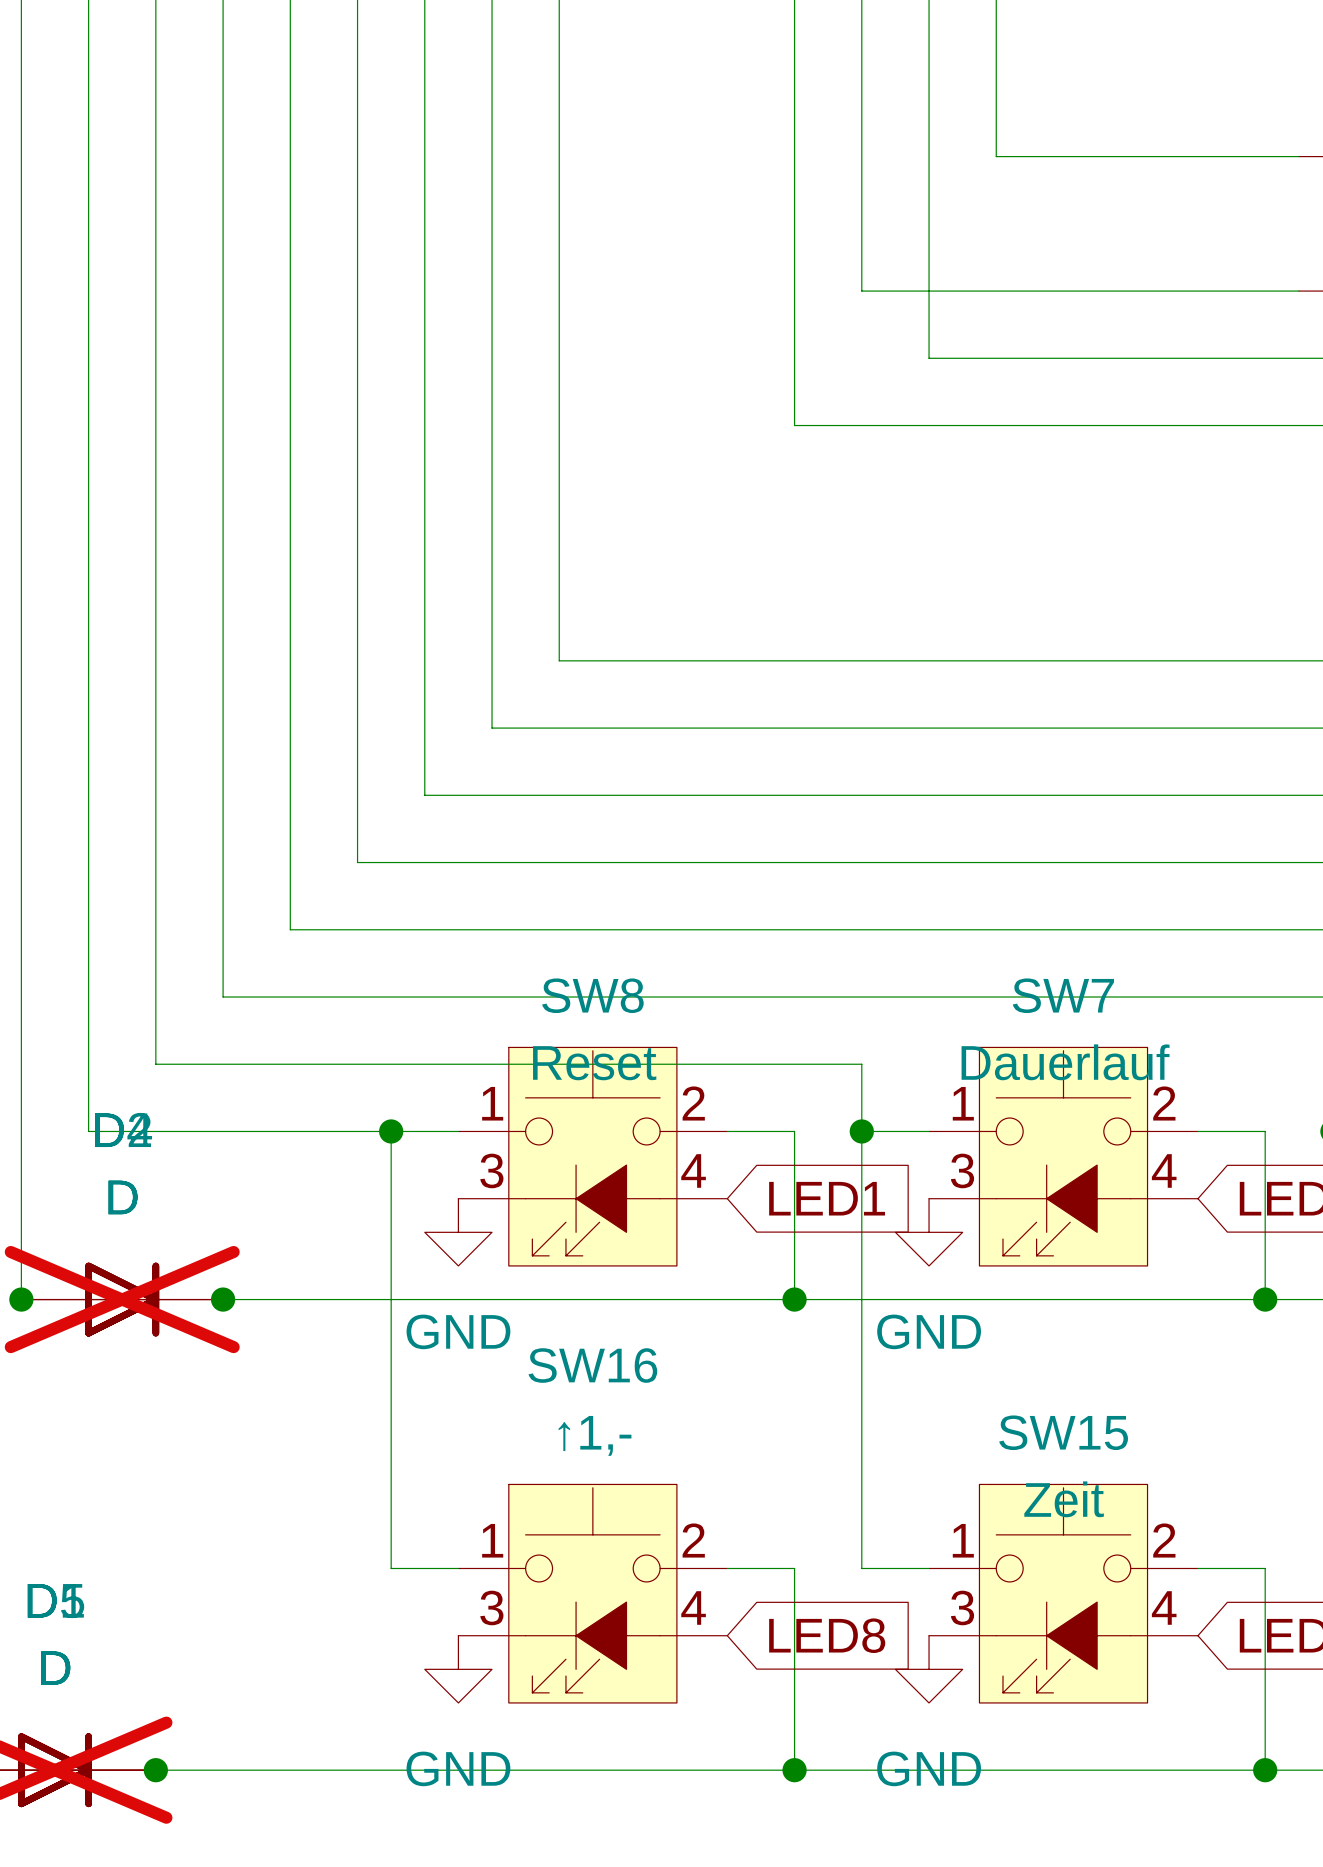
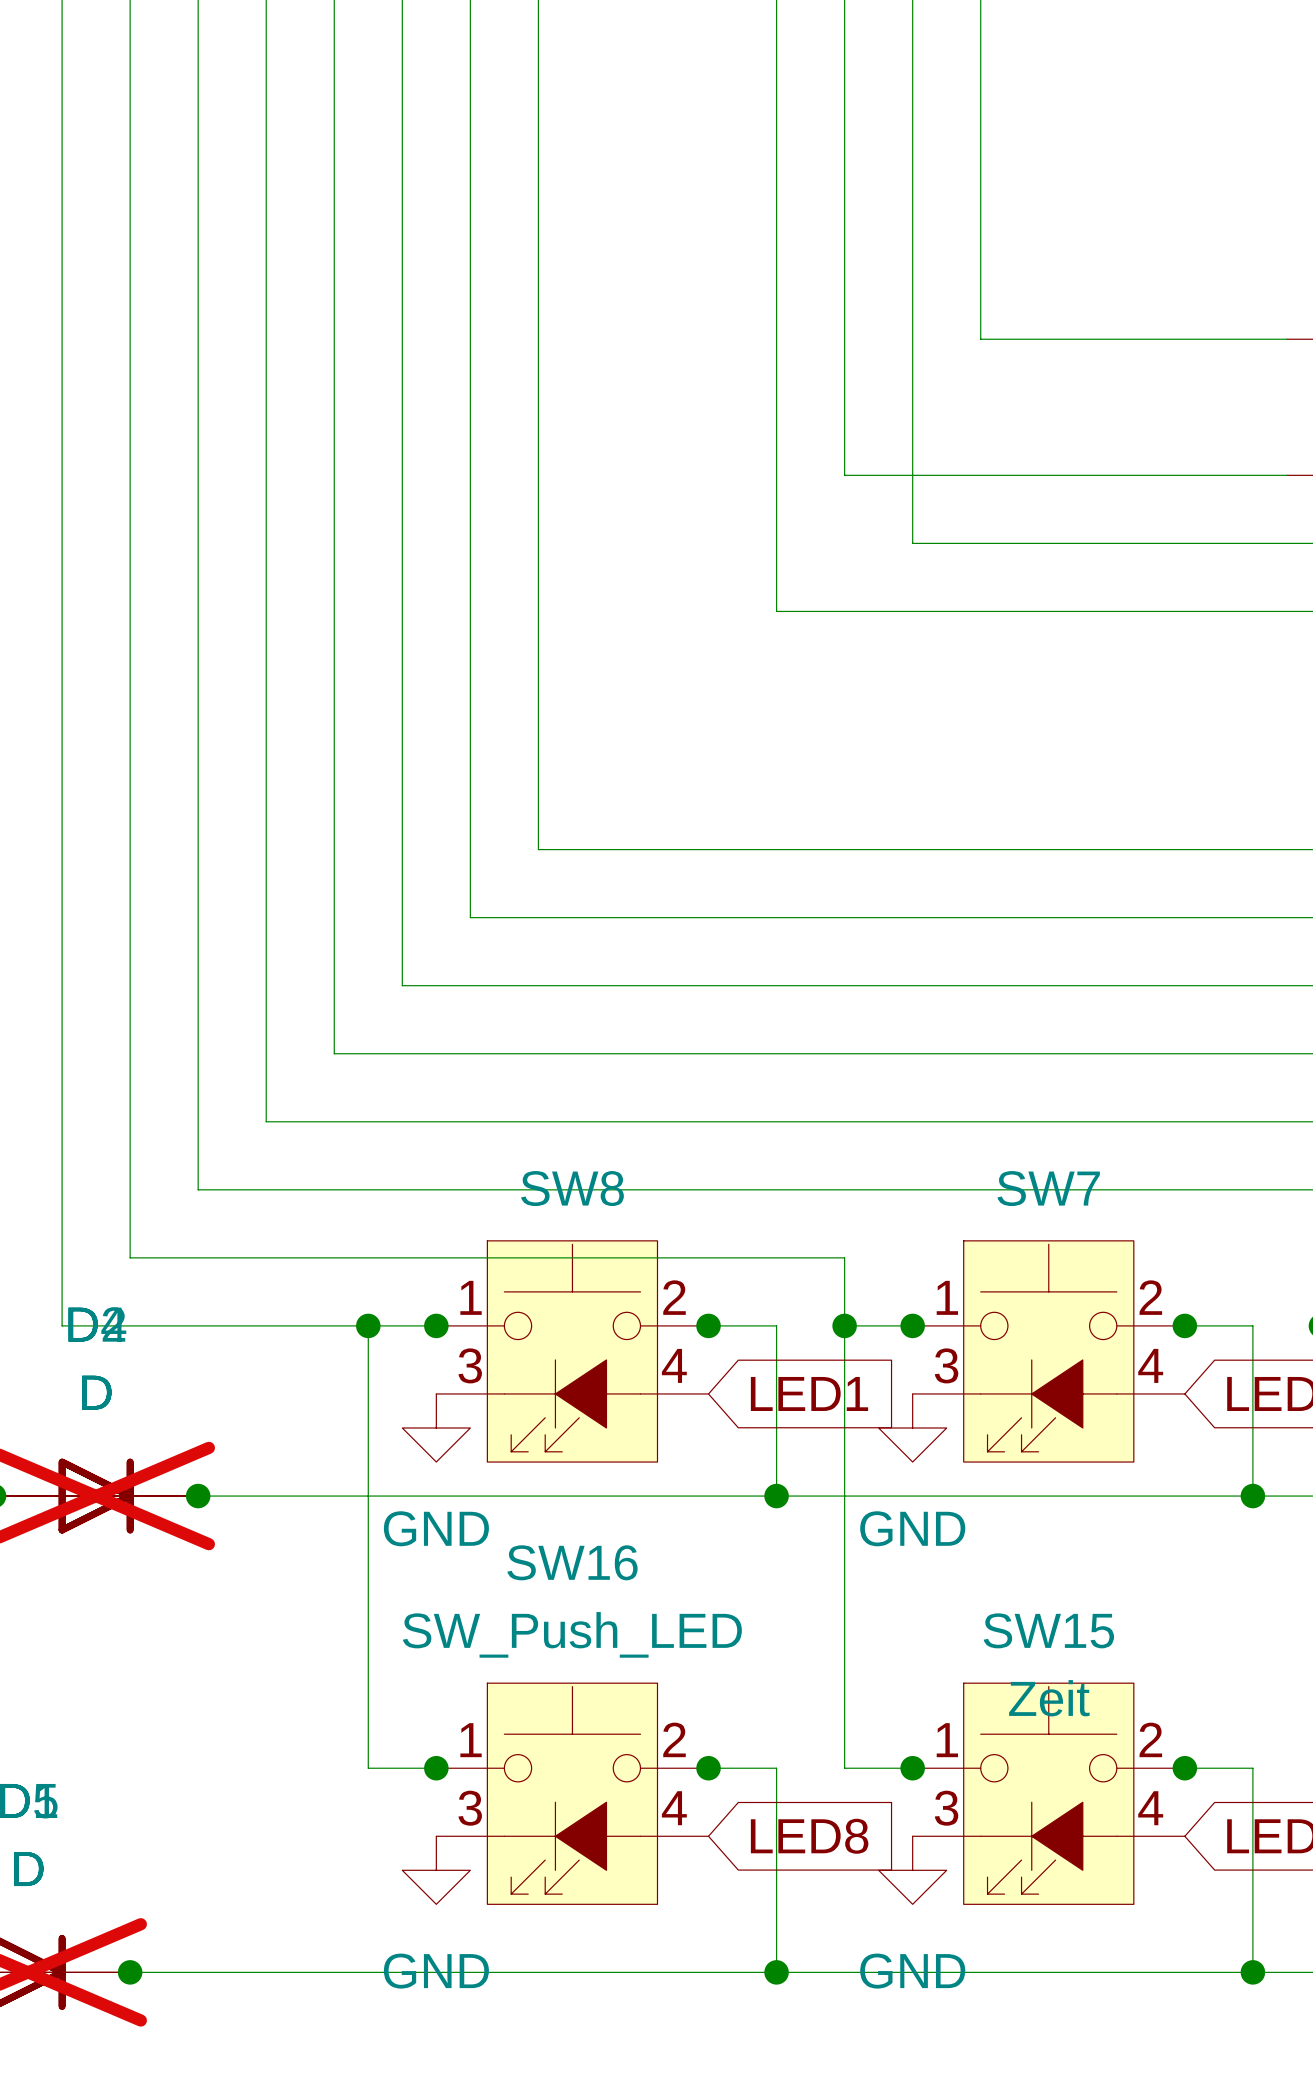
SW7 value: Dauerlauf (1065, 1062) -> none
SW8 value: Reset (594, 1063) -> none
junction: none -> (436, 1325)
junction: none -> (708, 1325)
junction: none -> (912, 1325)
junction: none -> (1184, 1325)
SW16 value: ↑1,- (595, 1435) -> SW_Push_LED (572, 1634)
junction: none -> (436, 1768)
junction: none -> (708, 1768)
junction: none -> (912, 1768)
junction: none -> (1184, 1768)

